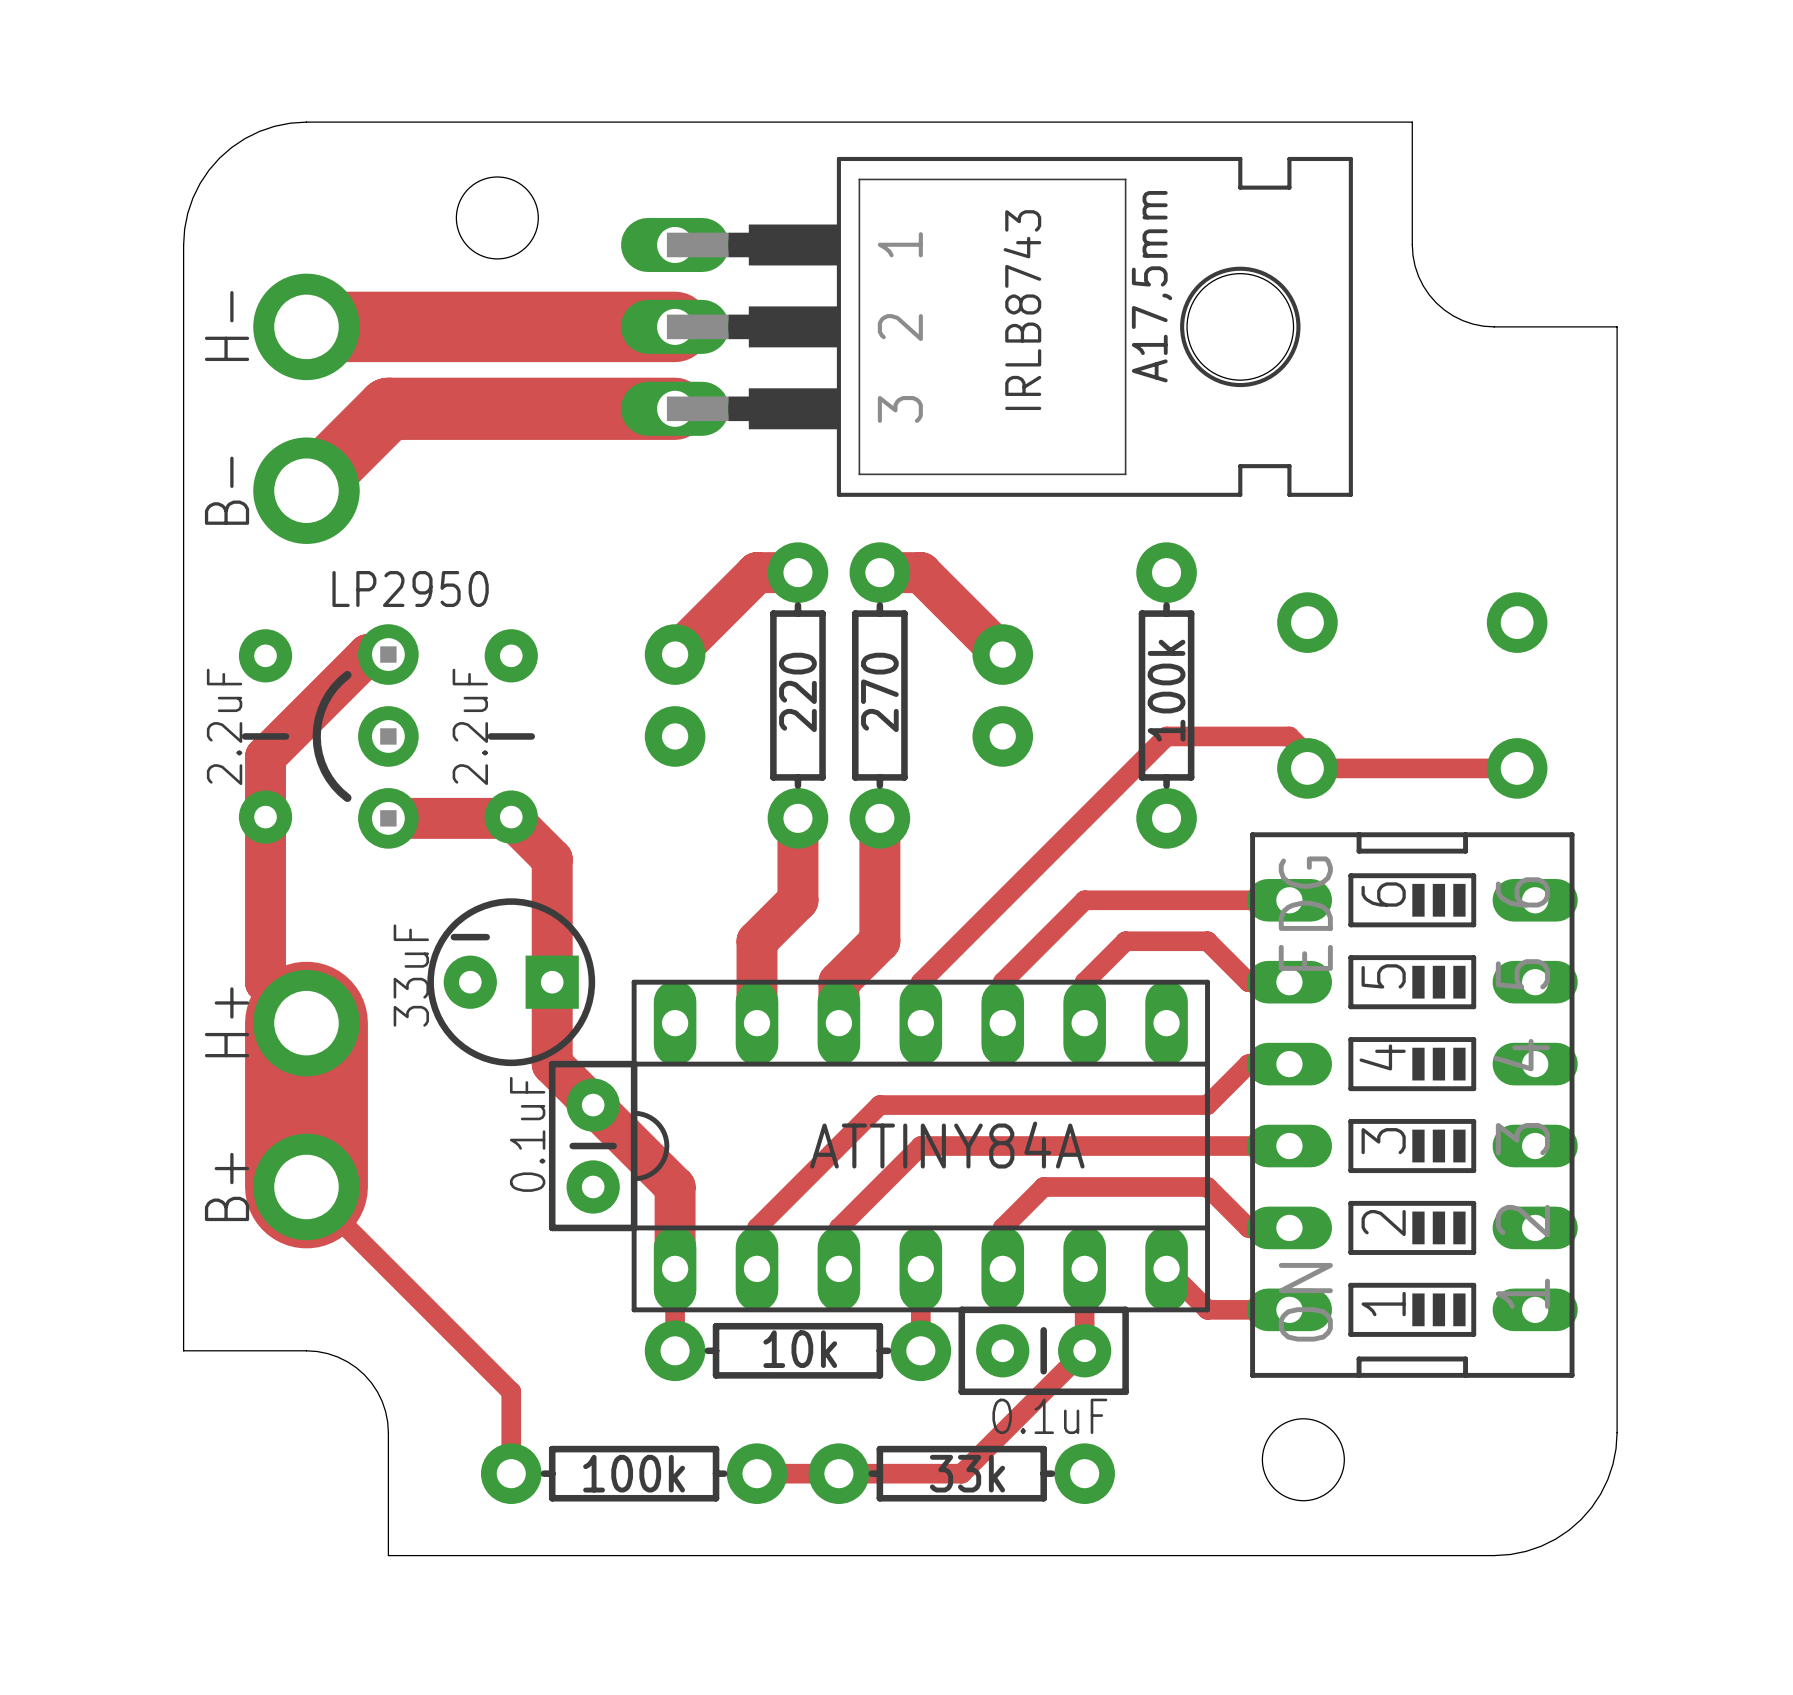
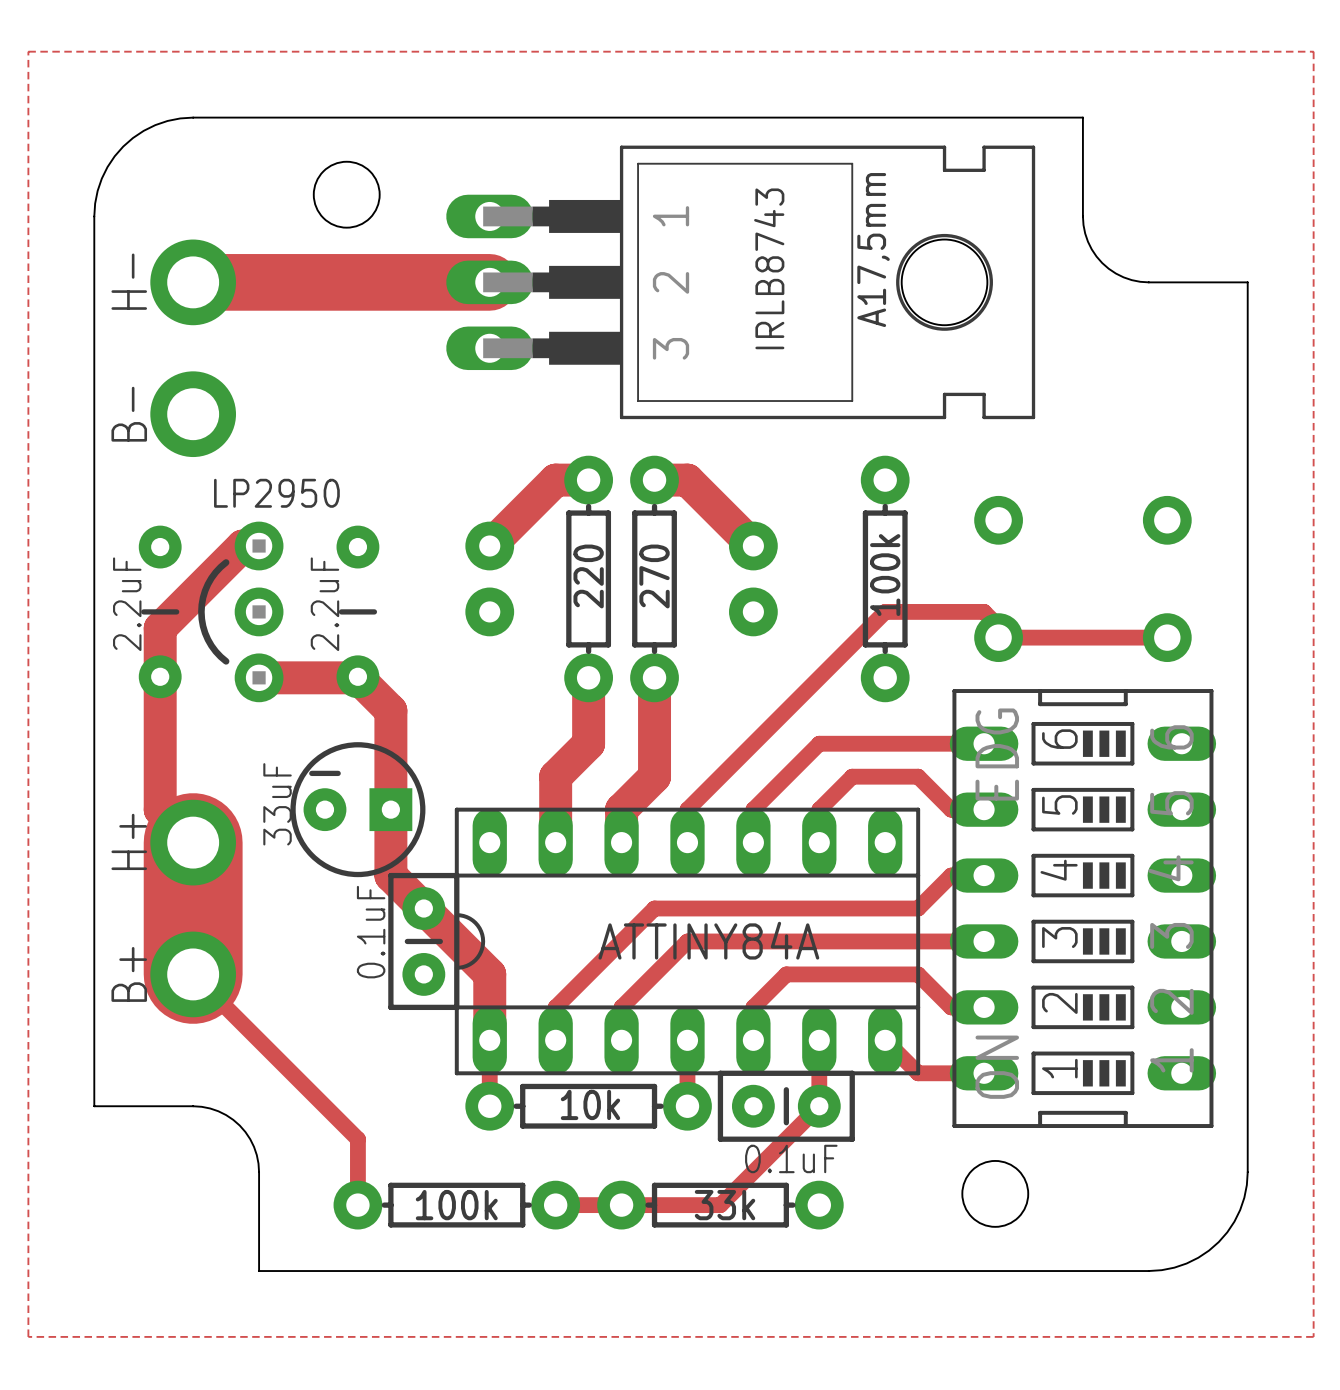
zone outline: none -> (28, 51) (1313, 51) (1313, 1336) (28, 1336) (28, 51)
track: (675, 408) (388, 408) (306, 490) -> none

